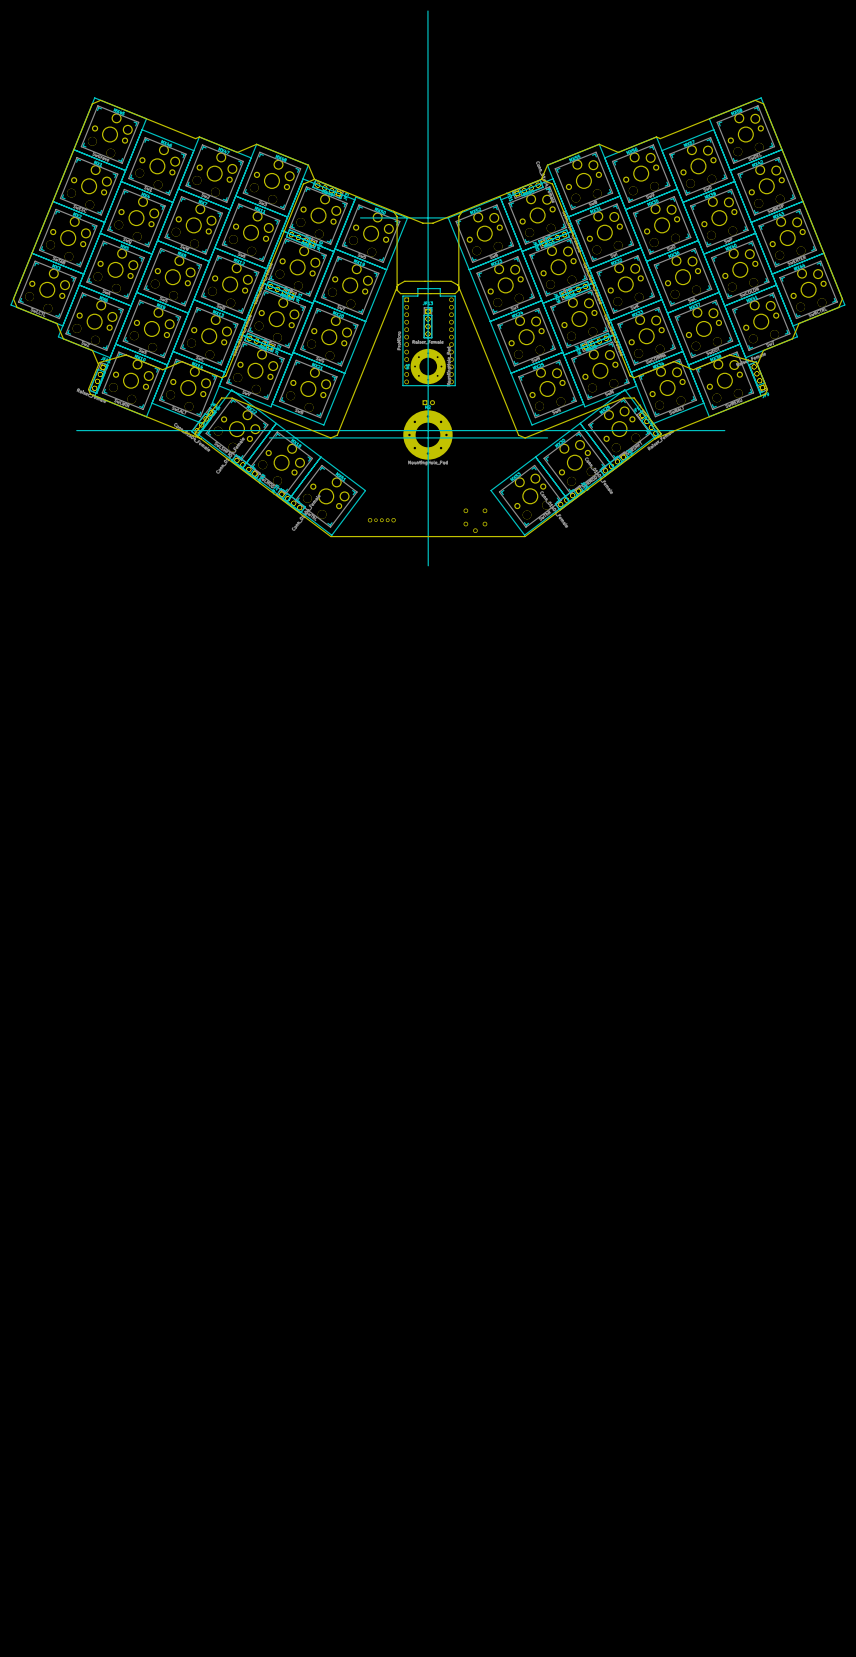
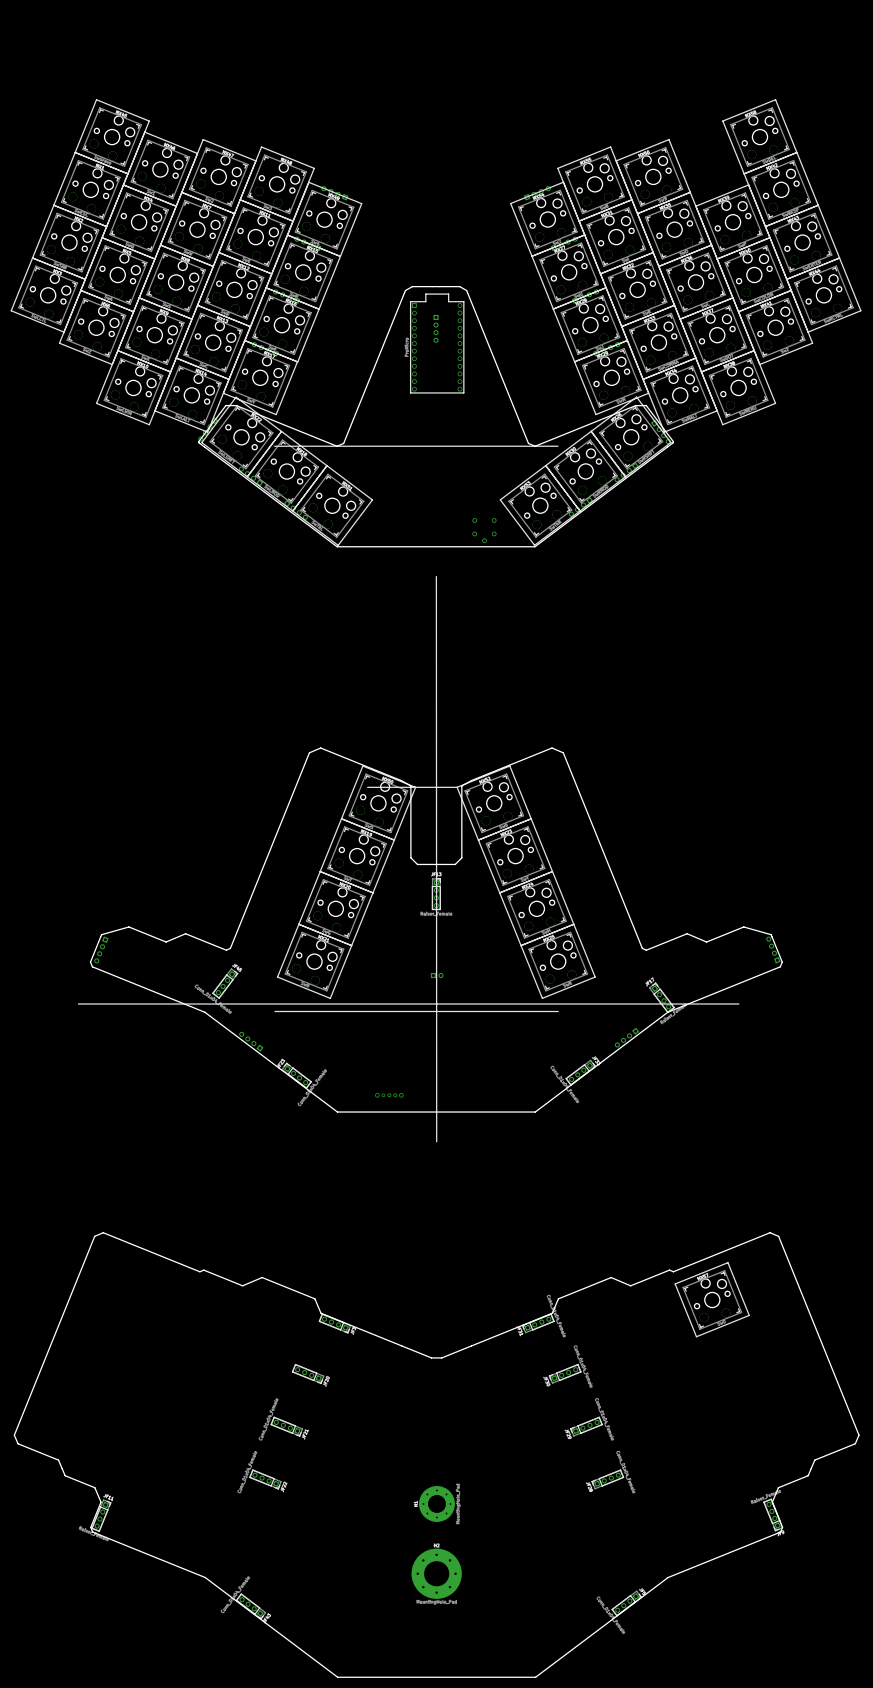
line: (427, 11) (428, 565) -> (436, 1141) (436, 576)
part position: (698, 166) -> (712, 1299)
board edge: (314, 179) (393, 211) -> none
board edge: (314, 179) (308, 165) (256, 144) (237, 152) (199, 137) (195, 138) (100, 100) (92, 103) (13, 298) (17, 307) (56, 323) (63, 338) (92, 350) (98, 364) -> none
board edge: (314, 179) (303, 184) (225, 375) (221, 377) (181, 361) (162, 369) (126, 355) (99, 362) (88, 389) (90, 394) (200, 438) -> none
board edge: (541, 179) (552, 184) (630, 375) (633, 377) (674, 361) (693, 369) (729, 355) (756, 362) (767, 389) (765, 394) (655, 438) -> none
board edge: (541, 179) (462, 211) -> none
board edge: (541, 179) (547, 165) (599, 144) (618, 152) (656, 137) (660, 138) (755, 100) (763, 103) (842, 298) (838, 307) (799, 323) (792, 338) (763, 350) (757, 364) -> none
part position: (328, 189) -> (334, 1323)
part position: (527, 189) -> (538, 1323)
board edge: (393, 211) (397, 216) (397, 290) (400, 293) (455, 293) (458, 290) (458, 216) (462, 211) -> none
board edge: (393, 211) (422, 223) (432, 223) (462, 211) -> none
line: (448, 217) (360, 217) -> none
part position: (371, 233) -> (378, 803)
part position: (484, 233) -> (494, 803)
part position: (301, 238) -> (308, 1373)
part position: (554, 238) -> (565, 1373)
part position: (350, 285) -> (357, 855)
part position: (505, 285) -> (515, 855)
part position: (280, 290) -> (286, 1426)
part position: (574, 290) -> (586, 1426)
part position: (427, 322) -> (436, 894)
part position: (329, 336) -> (335, 908)
part position: (526, 336) -> (536, 908)
part position: (259, 342) -> (265, 1479)
part position: (595, 342) -> (607, 1479)
part position: (428, 366) -> (436, 1503)
part: (99, 377) -> none
part position: (758, 377) -> (773, 1514)
part: (758, 377) -> none
part position: (98, 378) -> (101, 1515)
part position: (308, 388) -> (314, 961)
part position: (547, 388) -> (558, 961)
part: (428, 402) -> none
part position: (203, 422) -> (225, 983)
part position: (649, 424) -> (661, 997)
line: (76, 430) (724, 430) -> none
part position: (427, 434) -> (436, 1573)
part position: (614, 464) -> (626, 1603)
part position: (245, 467) -> (251, 1606)
part position: (569, 498) -> (580, 1072)
part position: (290, 500) -> (296, 1075)
part: (381, 520) -> none
board edge: none -> (320, 748) (309, 752) (230, 948) (226, 950) (185, 933) (166, 942) (128, 926) (101, 934) (90, 962) (92, 966) (204, 1012) (337, 1112) (535, 1112) (667, 1012) (780, 966) (782, 962) (771, 934) (743, 926) (706, 942) (687, 933) (646, 950) (642, 948) (563, 752) (552, 748) (461, 785) (461, 857) (455, 864) (417, 864) (410, 857) (410, 785) (320, 748)
line: none -> (457, 787) (367, 787)
part: none -> (101, 949)
part: none -> (773, 950)
part: none -> (437, 975)
line: none -> (78, 1004) (738, 1004)
line: none -> (274, 1011) (558, 1011)
part: none -> (627, 1037)
part: none -> (251, 1041)
part: none -> (389, 1095)
board edge: none -> (103, 1232) (199, 1271) (203, 1270) (242, 1285) (262, 1277) (314, 1298) (321, 1313) (431, 1357) (441, 1357) (552, 1313) (558, 1298) (611, 1277) (630, 1285) (669, 1270) (673, 1271) (770, 1232) (778, 1236) (858, 1435) (855, 1443) (814, 1460) (808, 1475) (778, 1487) (772, 1502) (782, 1527) (780, 1532) (668, 1577) (535, 1677) (337, 1677) (205, 1577) (92, 1532) (90, 1527) (100, 1502) (94, 1487) (65, 1475) (58, 1460) (18, 1443) (14, 1435) (94, 1236) (103, 1232)

